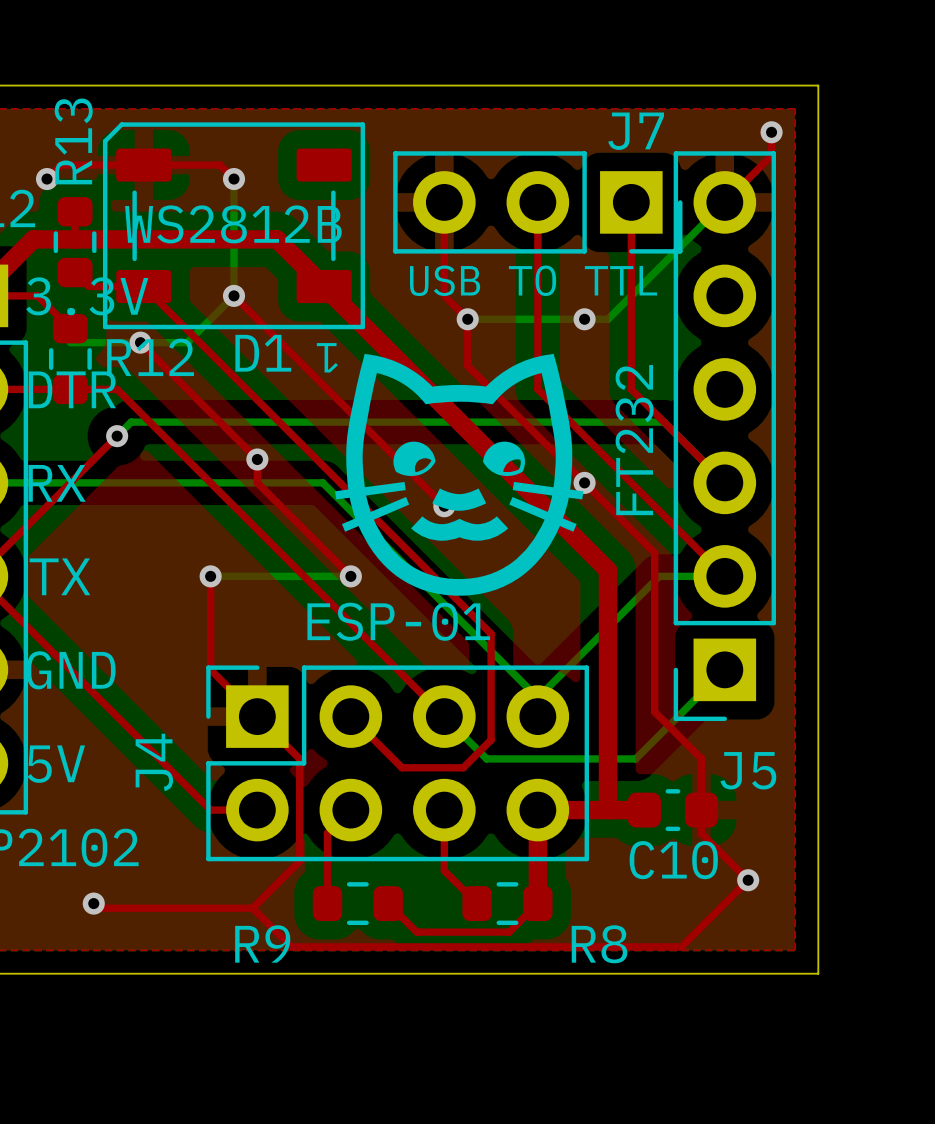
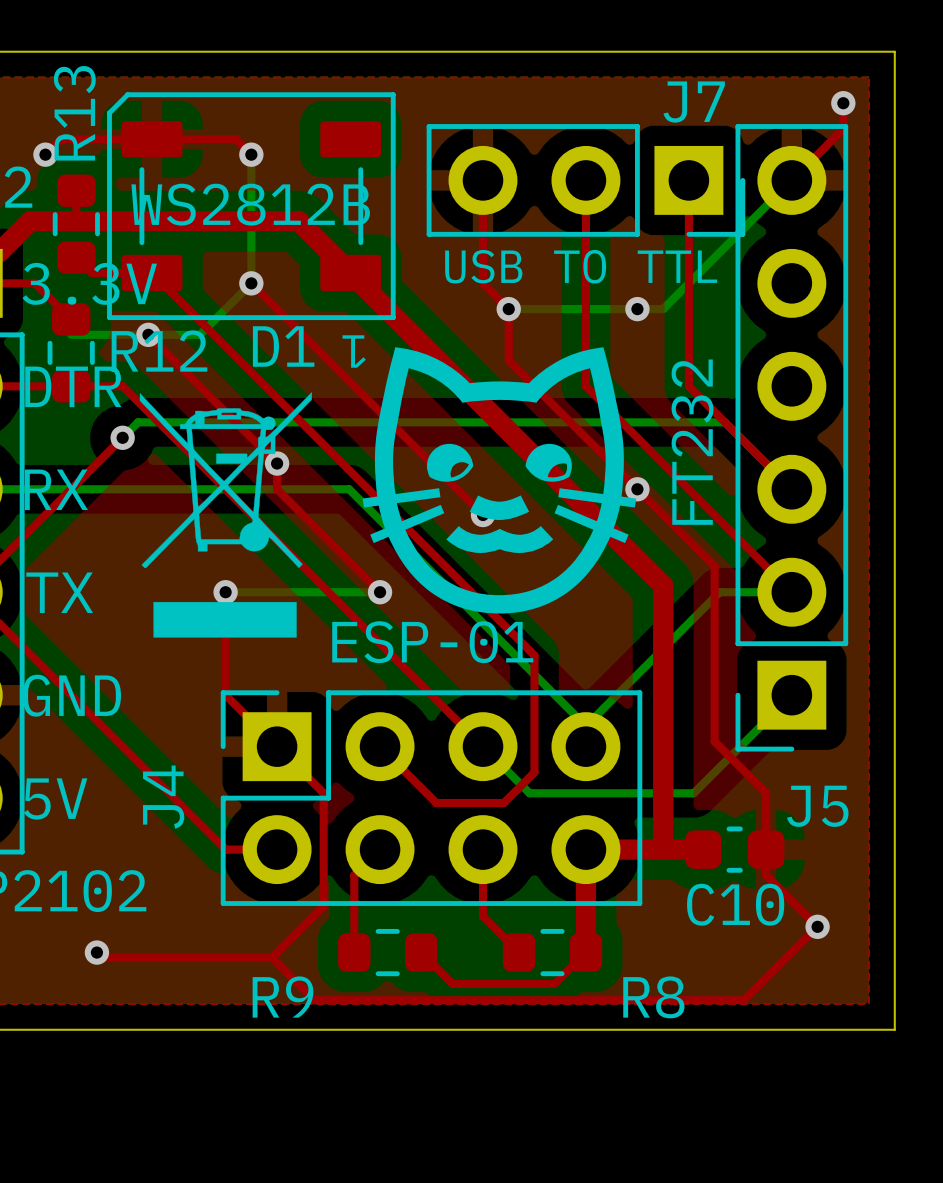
drawing: none -> [139, 392, 312, 638]

